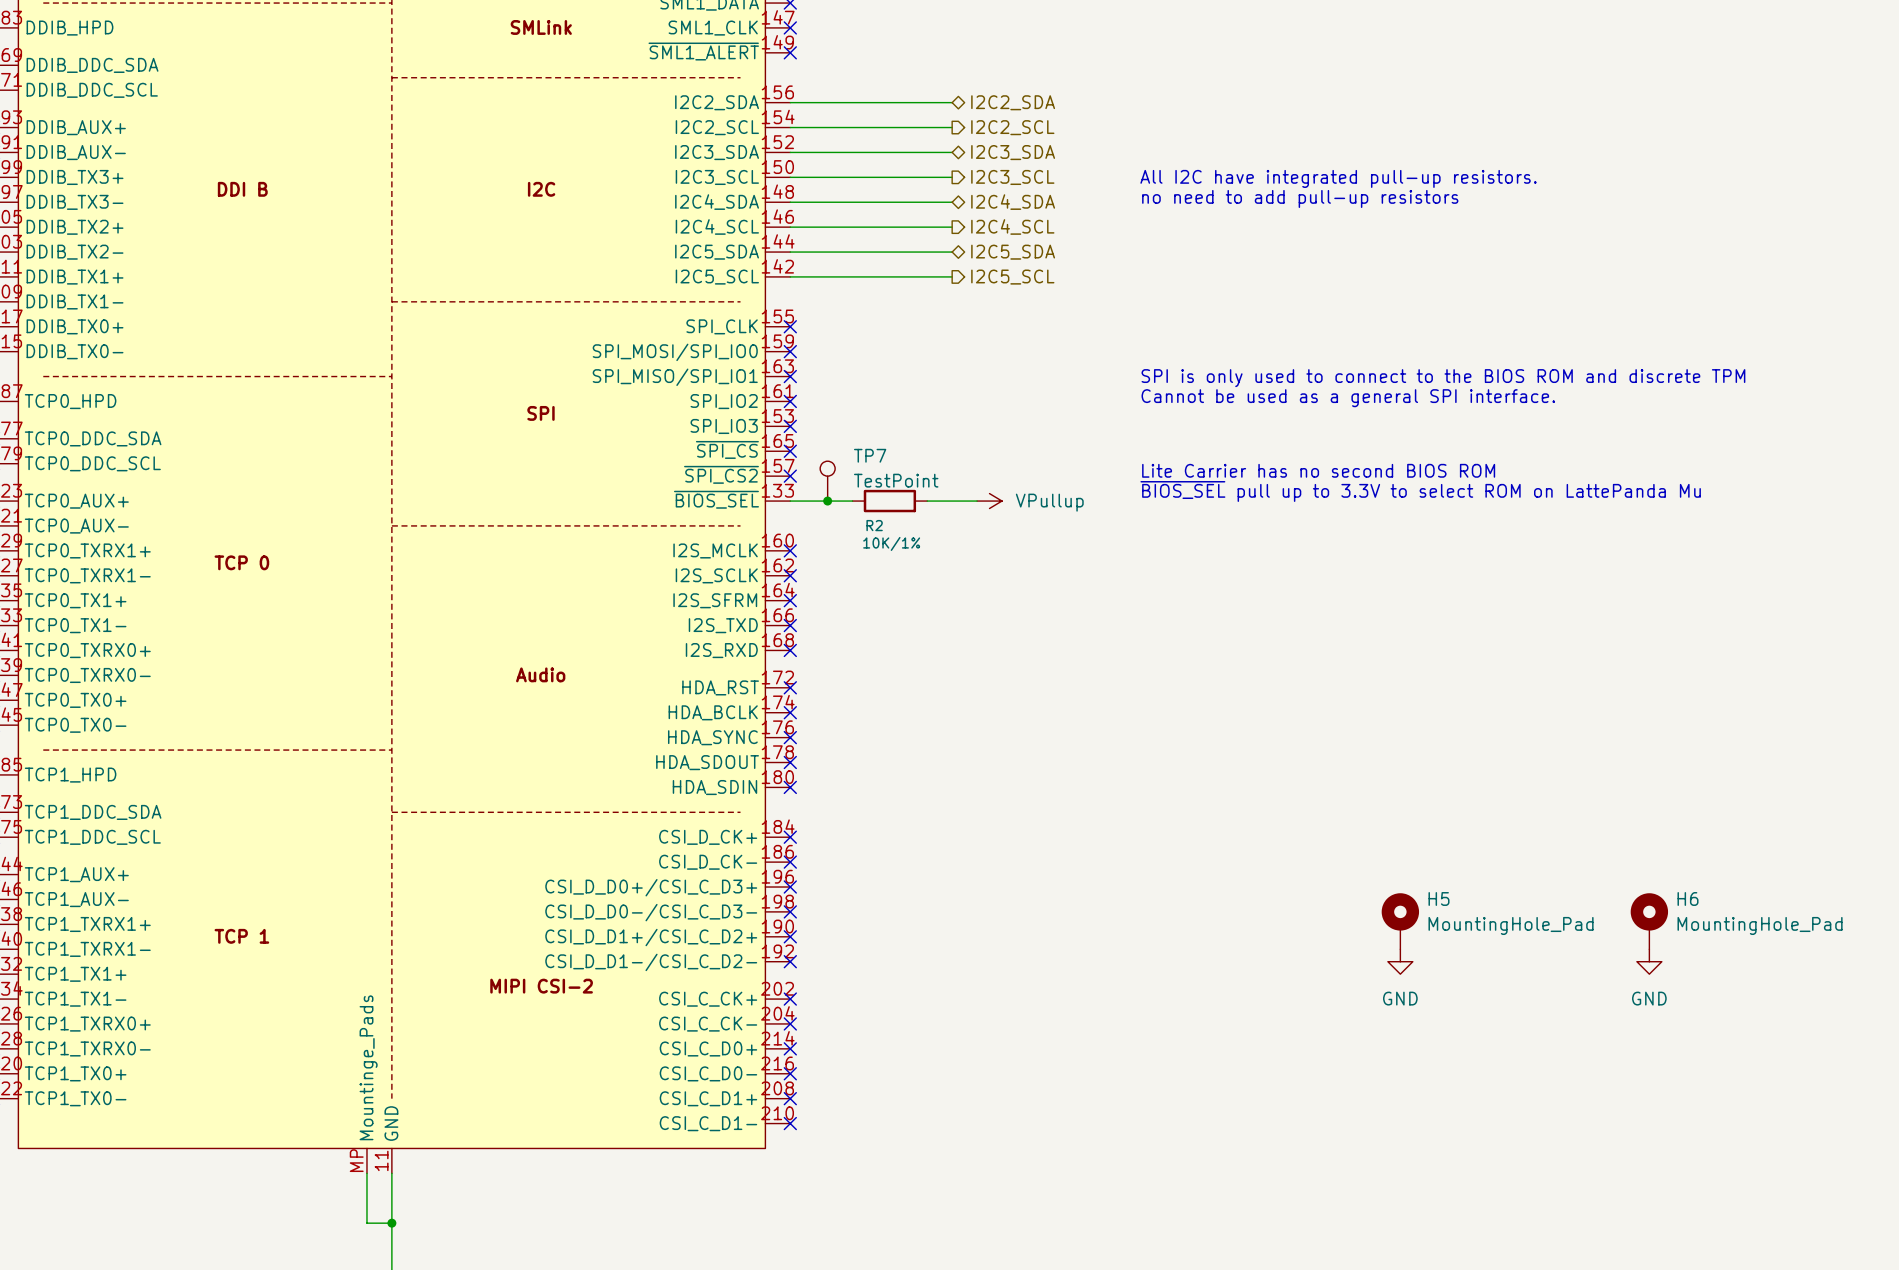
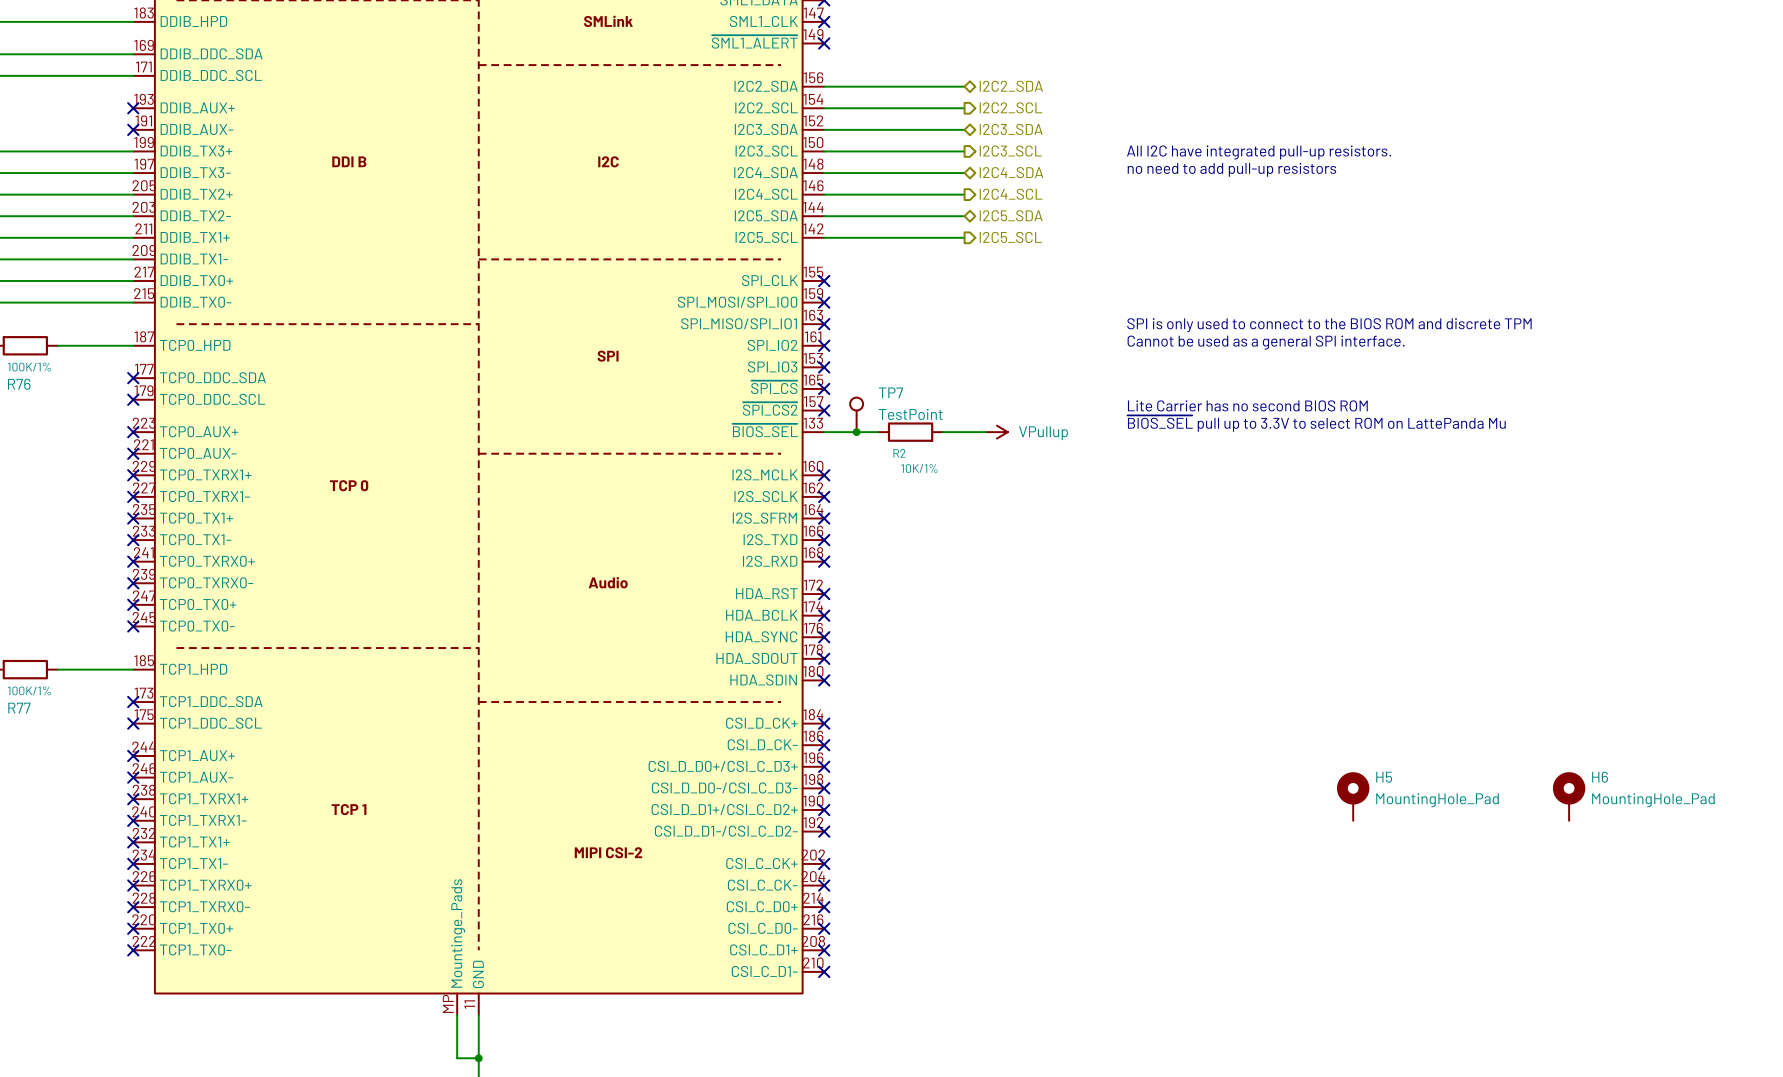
power symbol: GND (1400, 961) -> none
power symbol: GND (1649, 961) -> none

